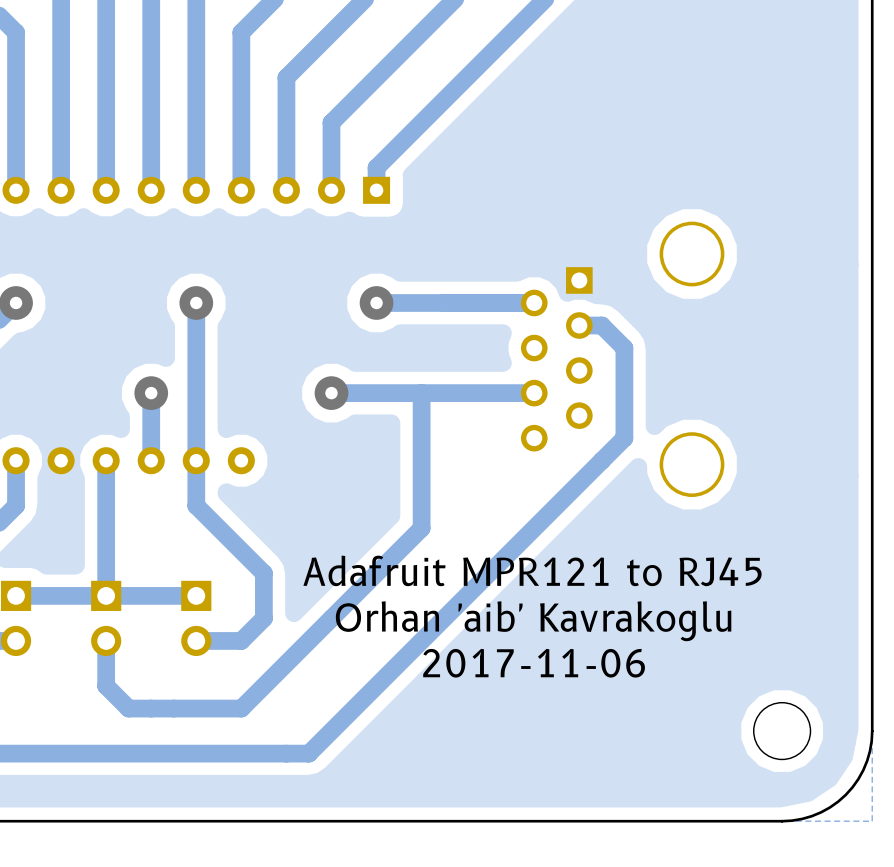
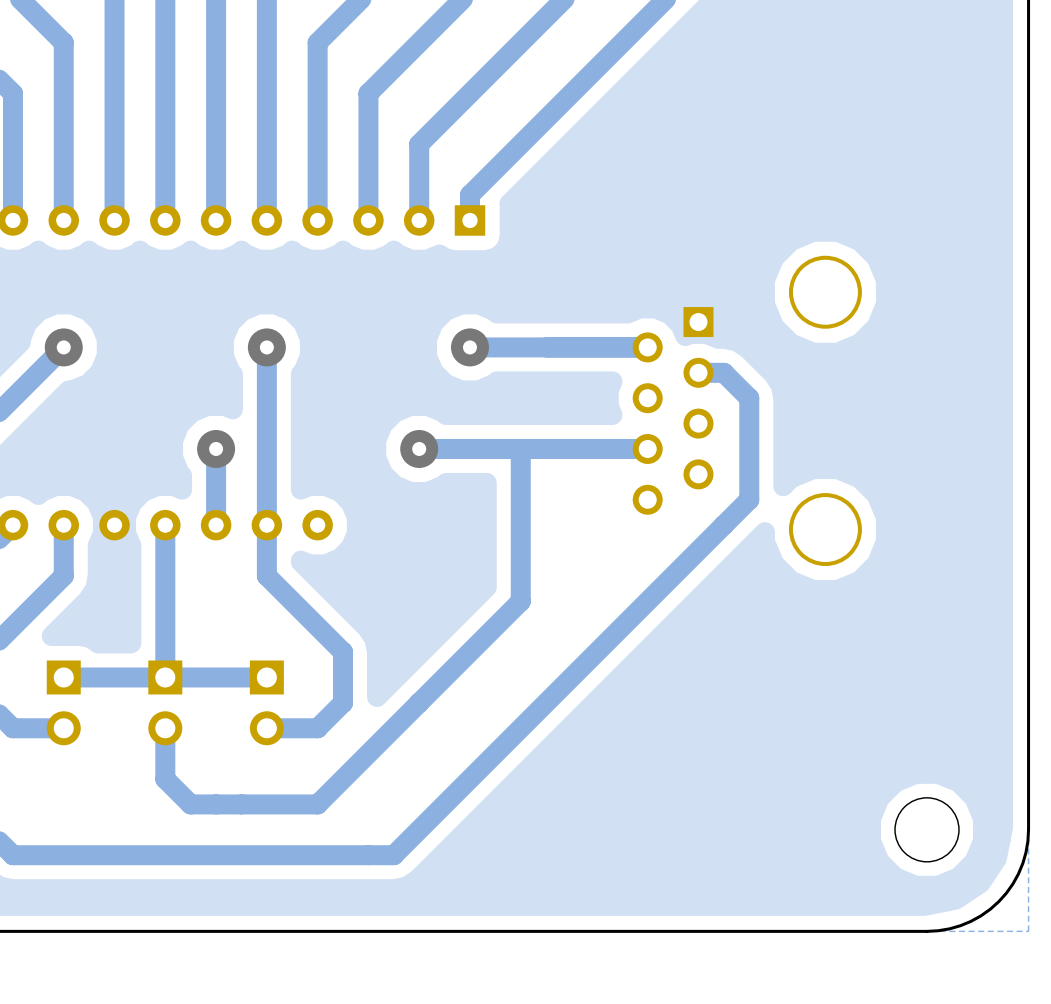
text: Adafruit MPR121 to RJ45 (532, 570) -> none
text: Orhan 'aib' Kavrakoglu (533, 621) -> none
text: 2017-11-06 (534, 663) -> none

